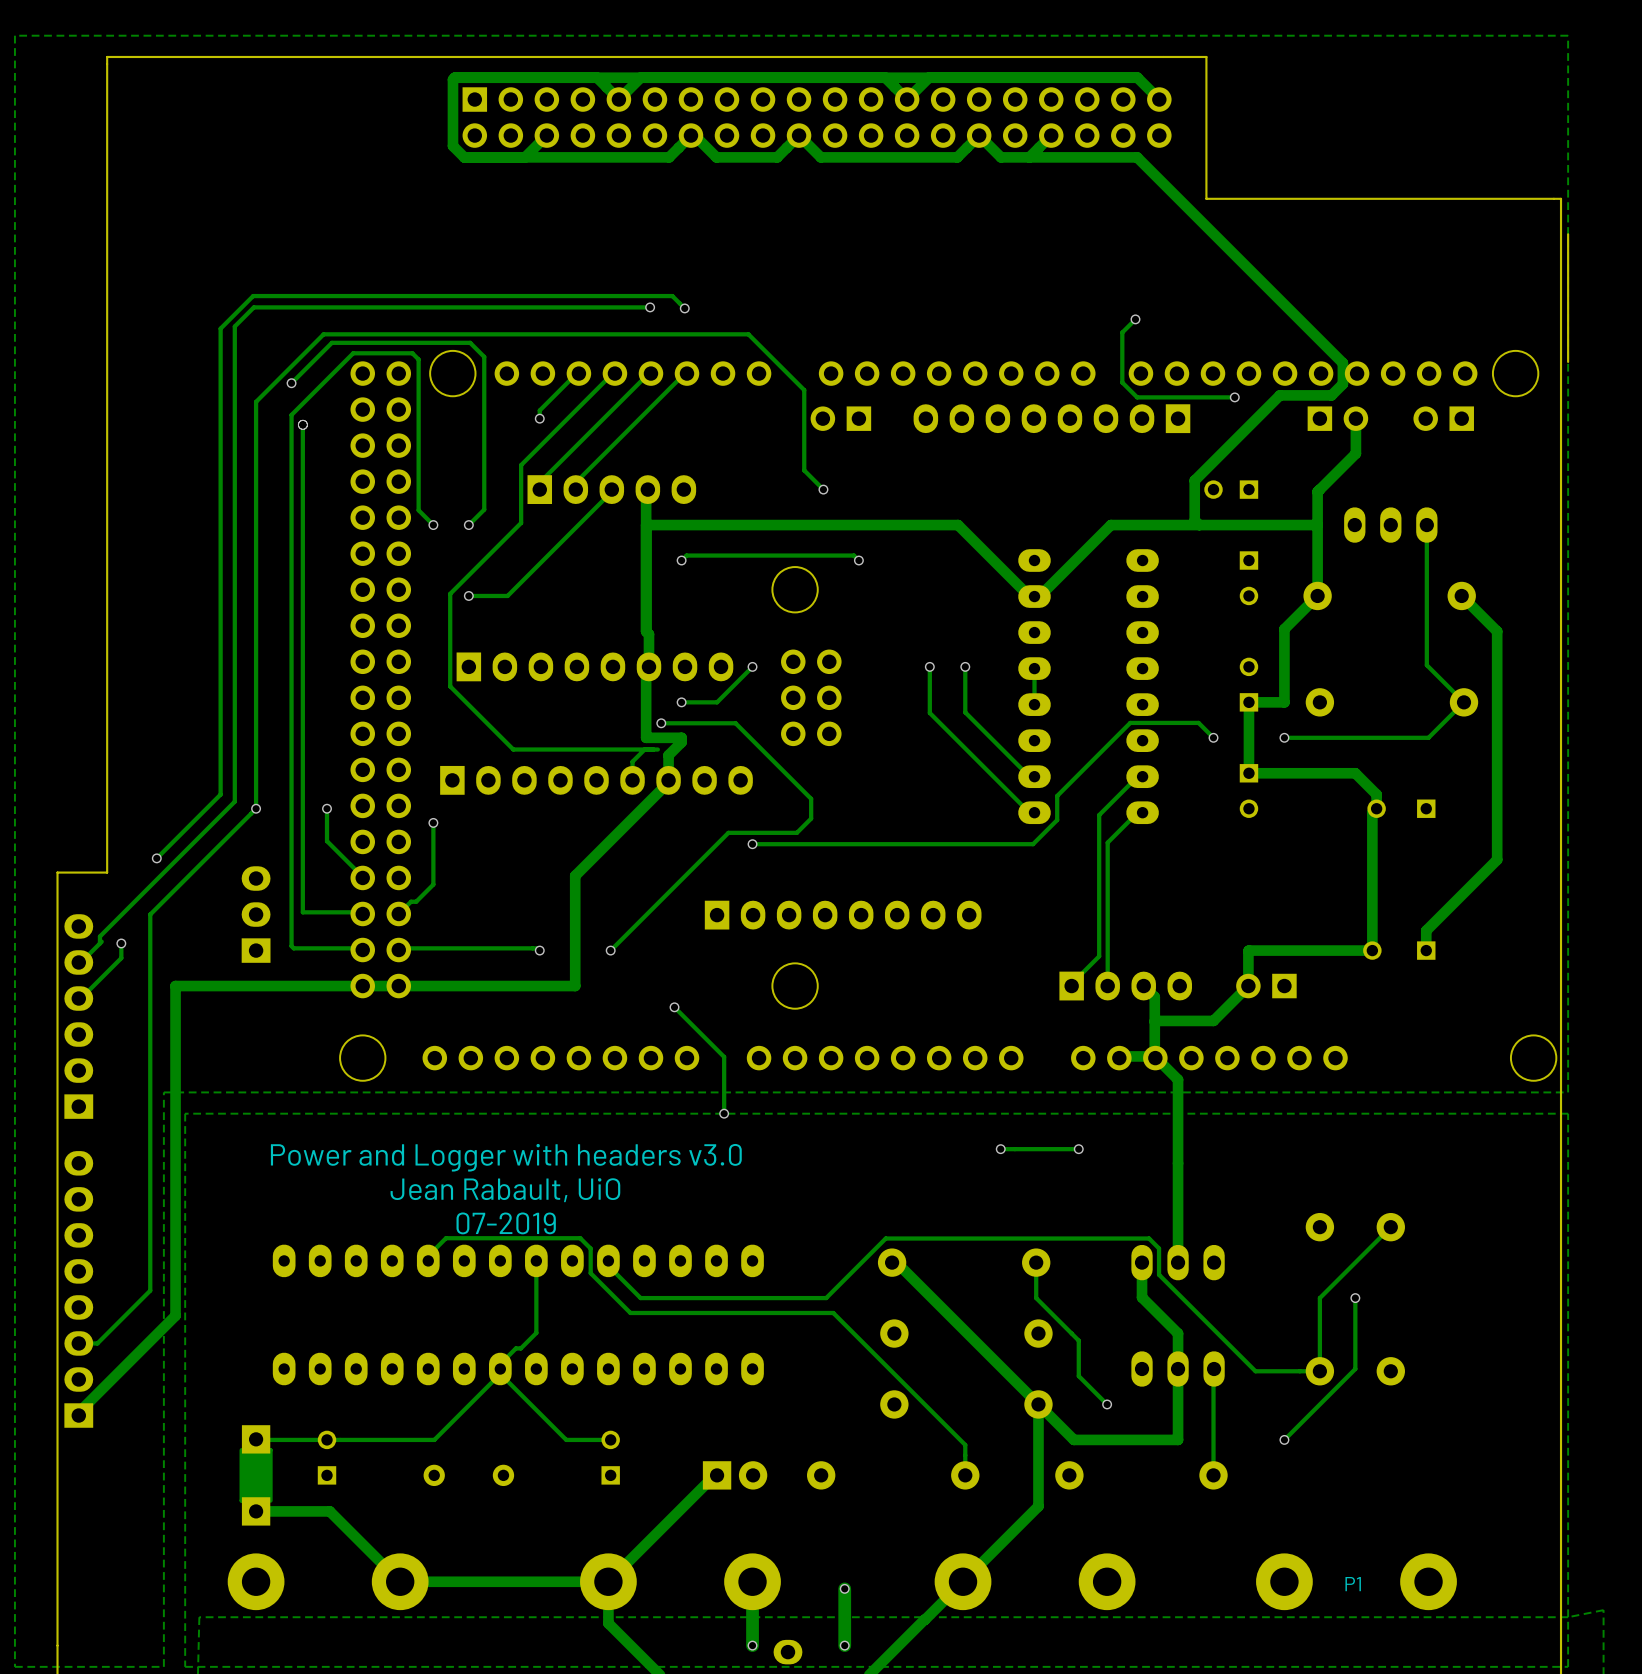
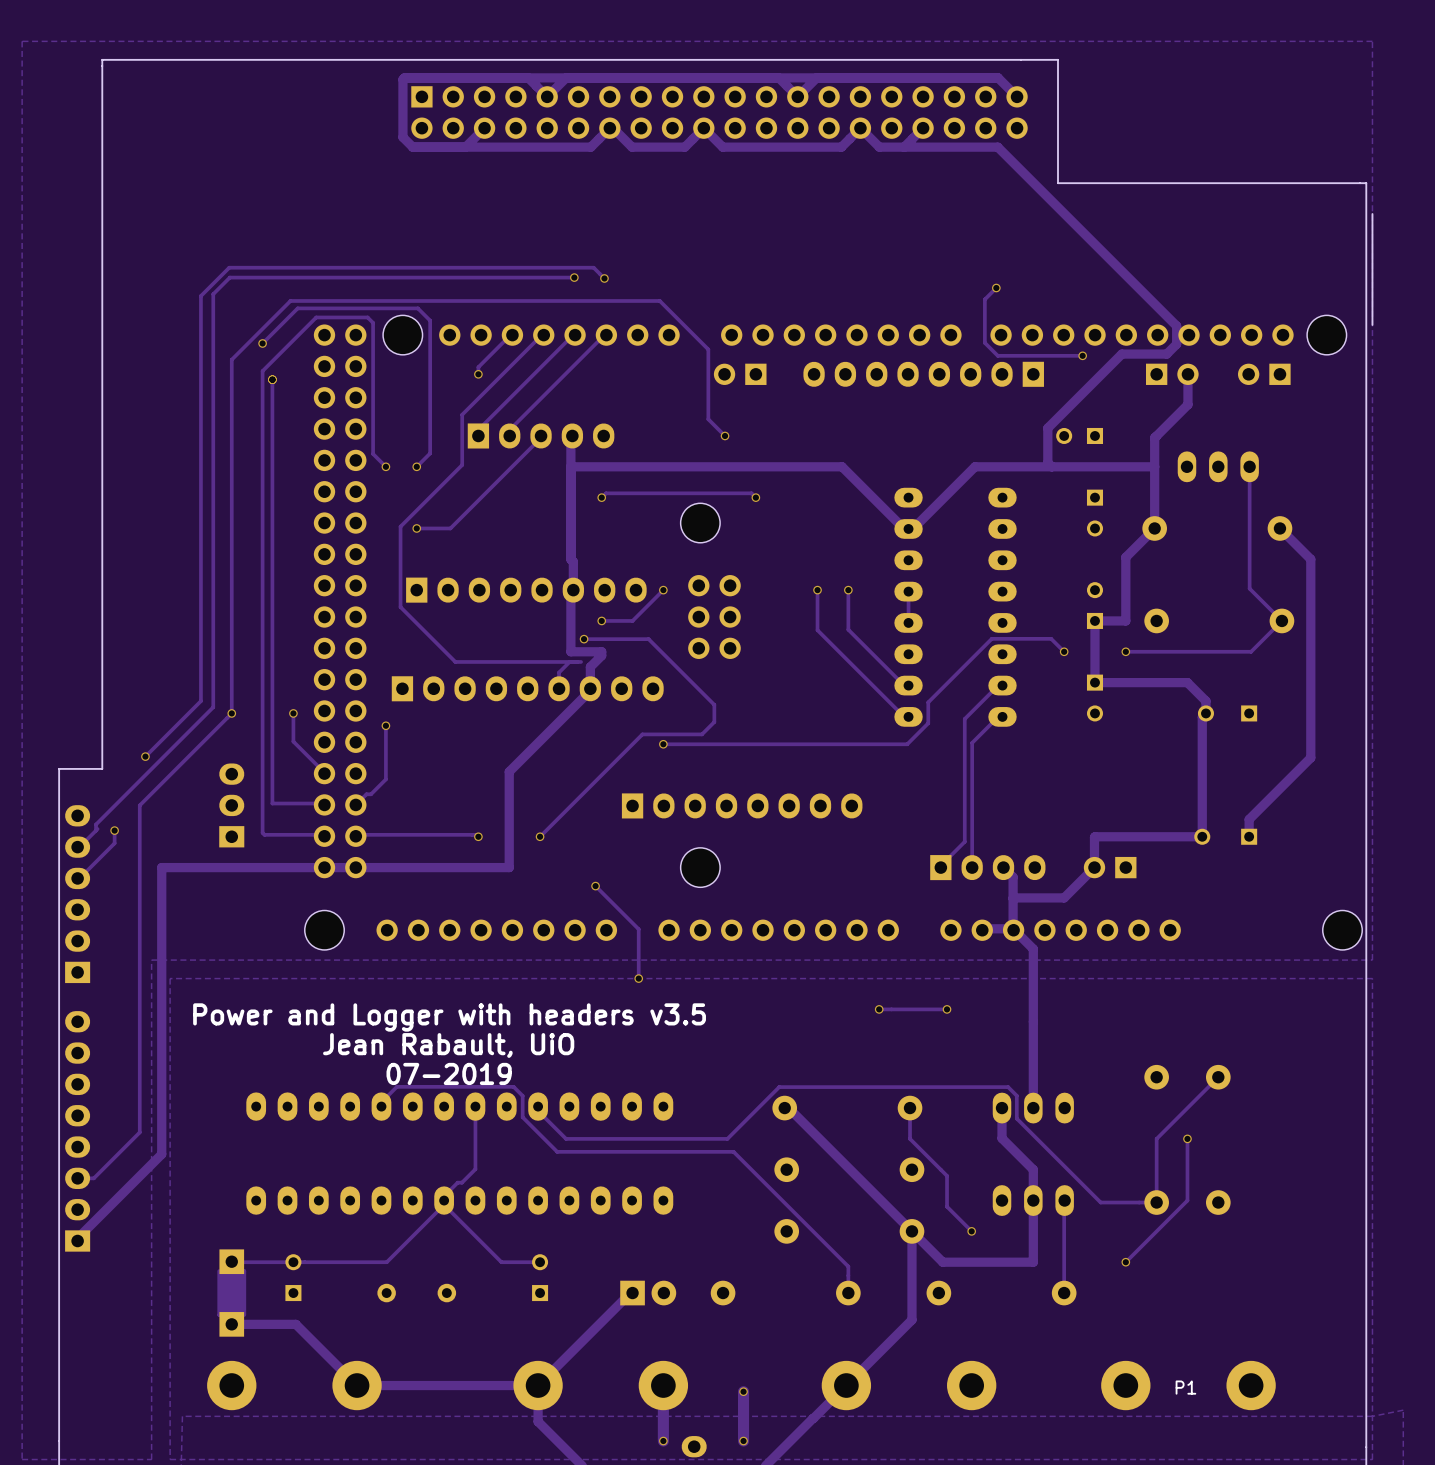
text: Power and Logger with headers v3.0 (506, 1157) -> Power and Logger with headers v3.5 (449, 1017)

